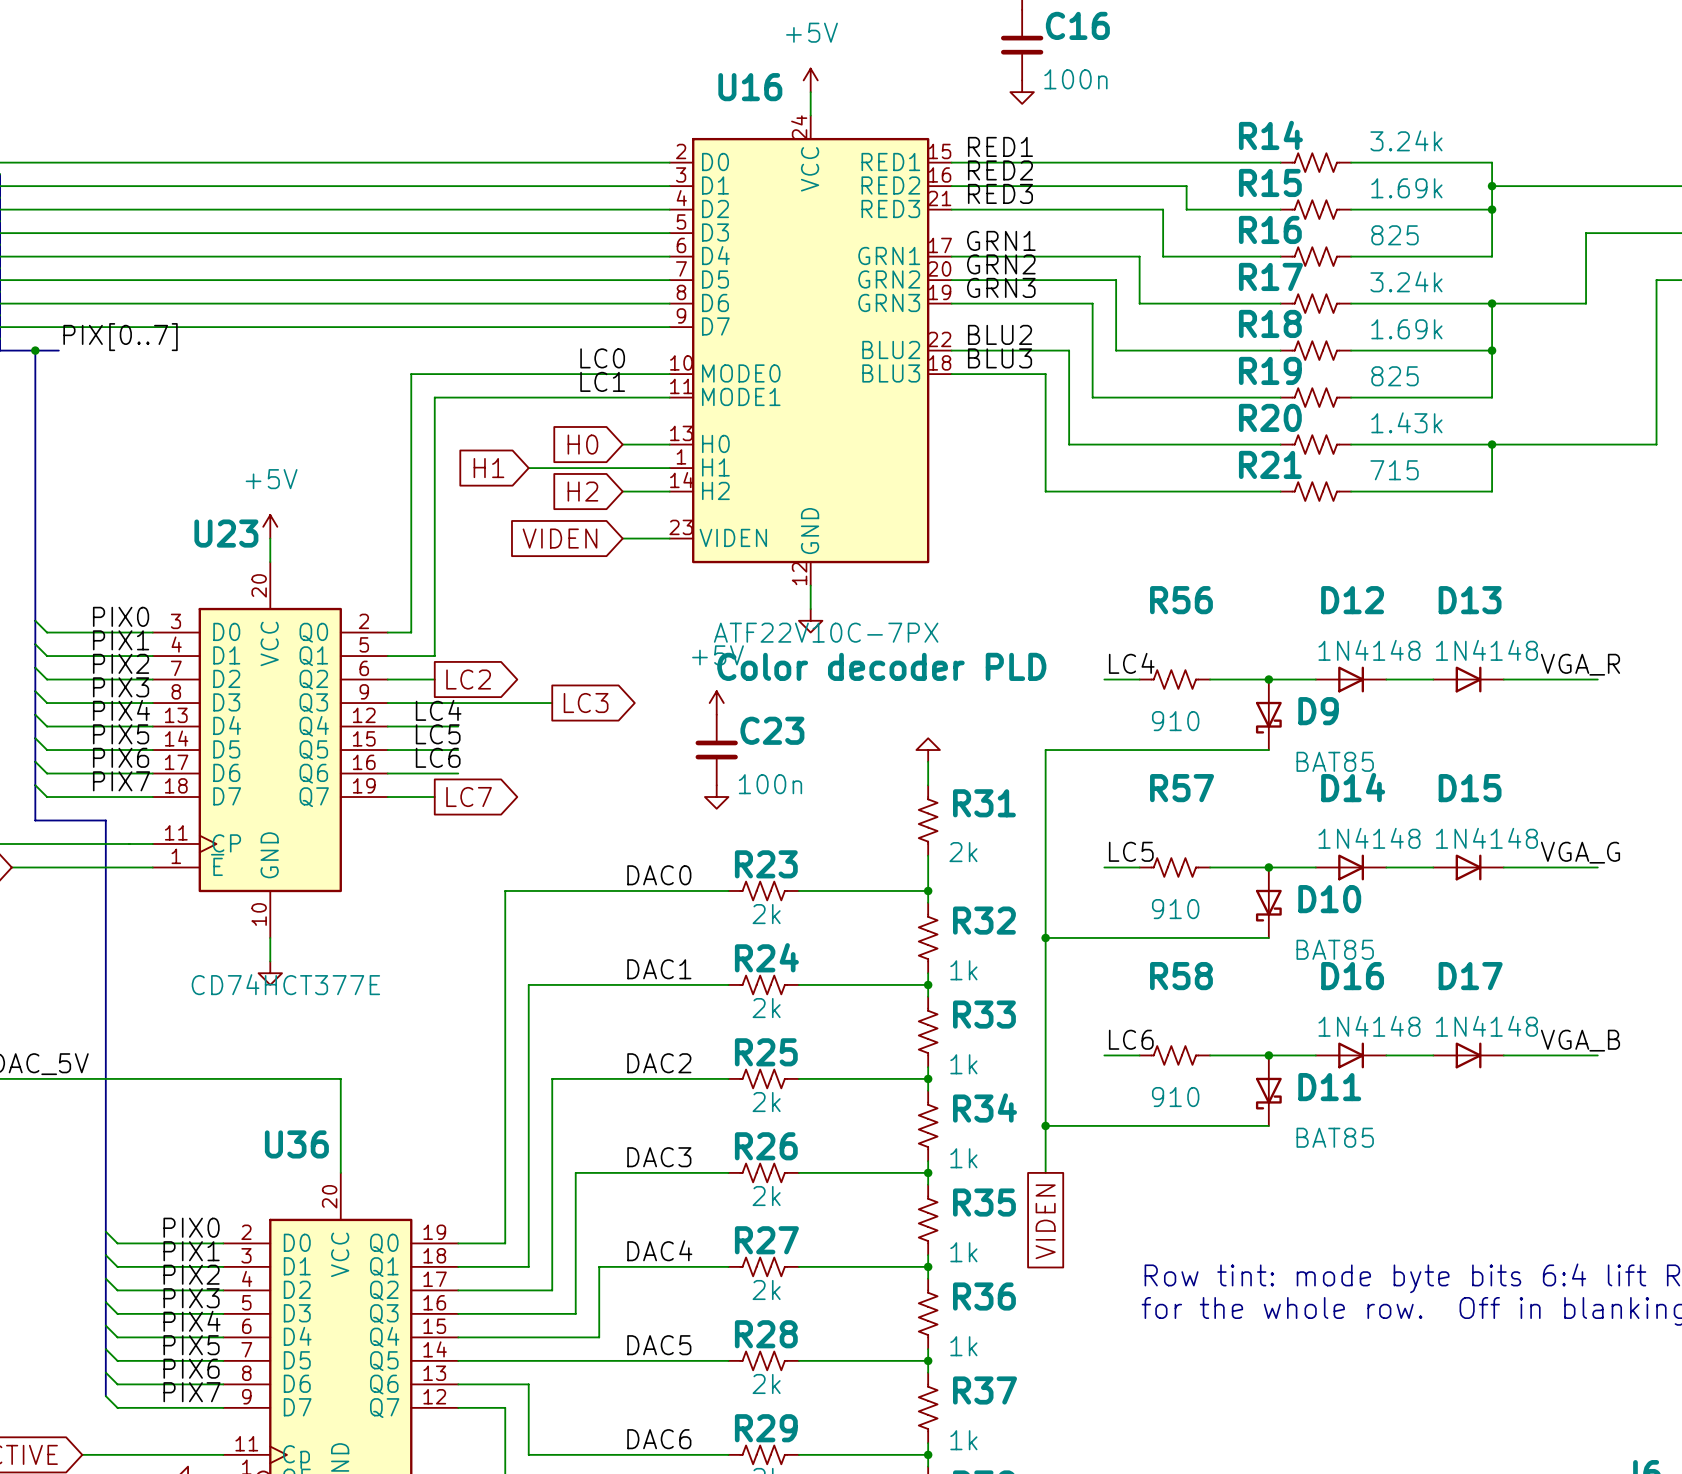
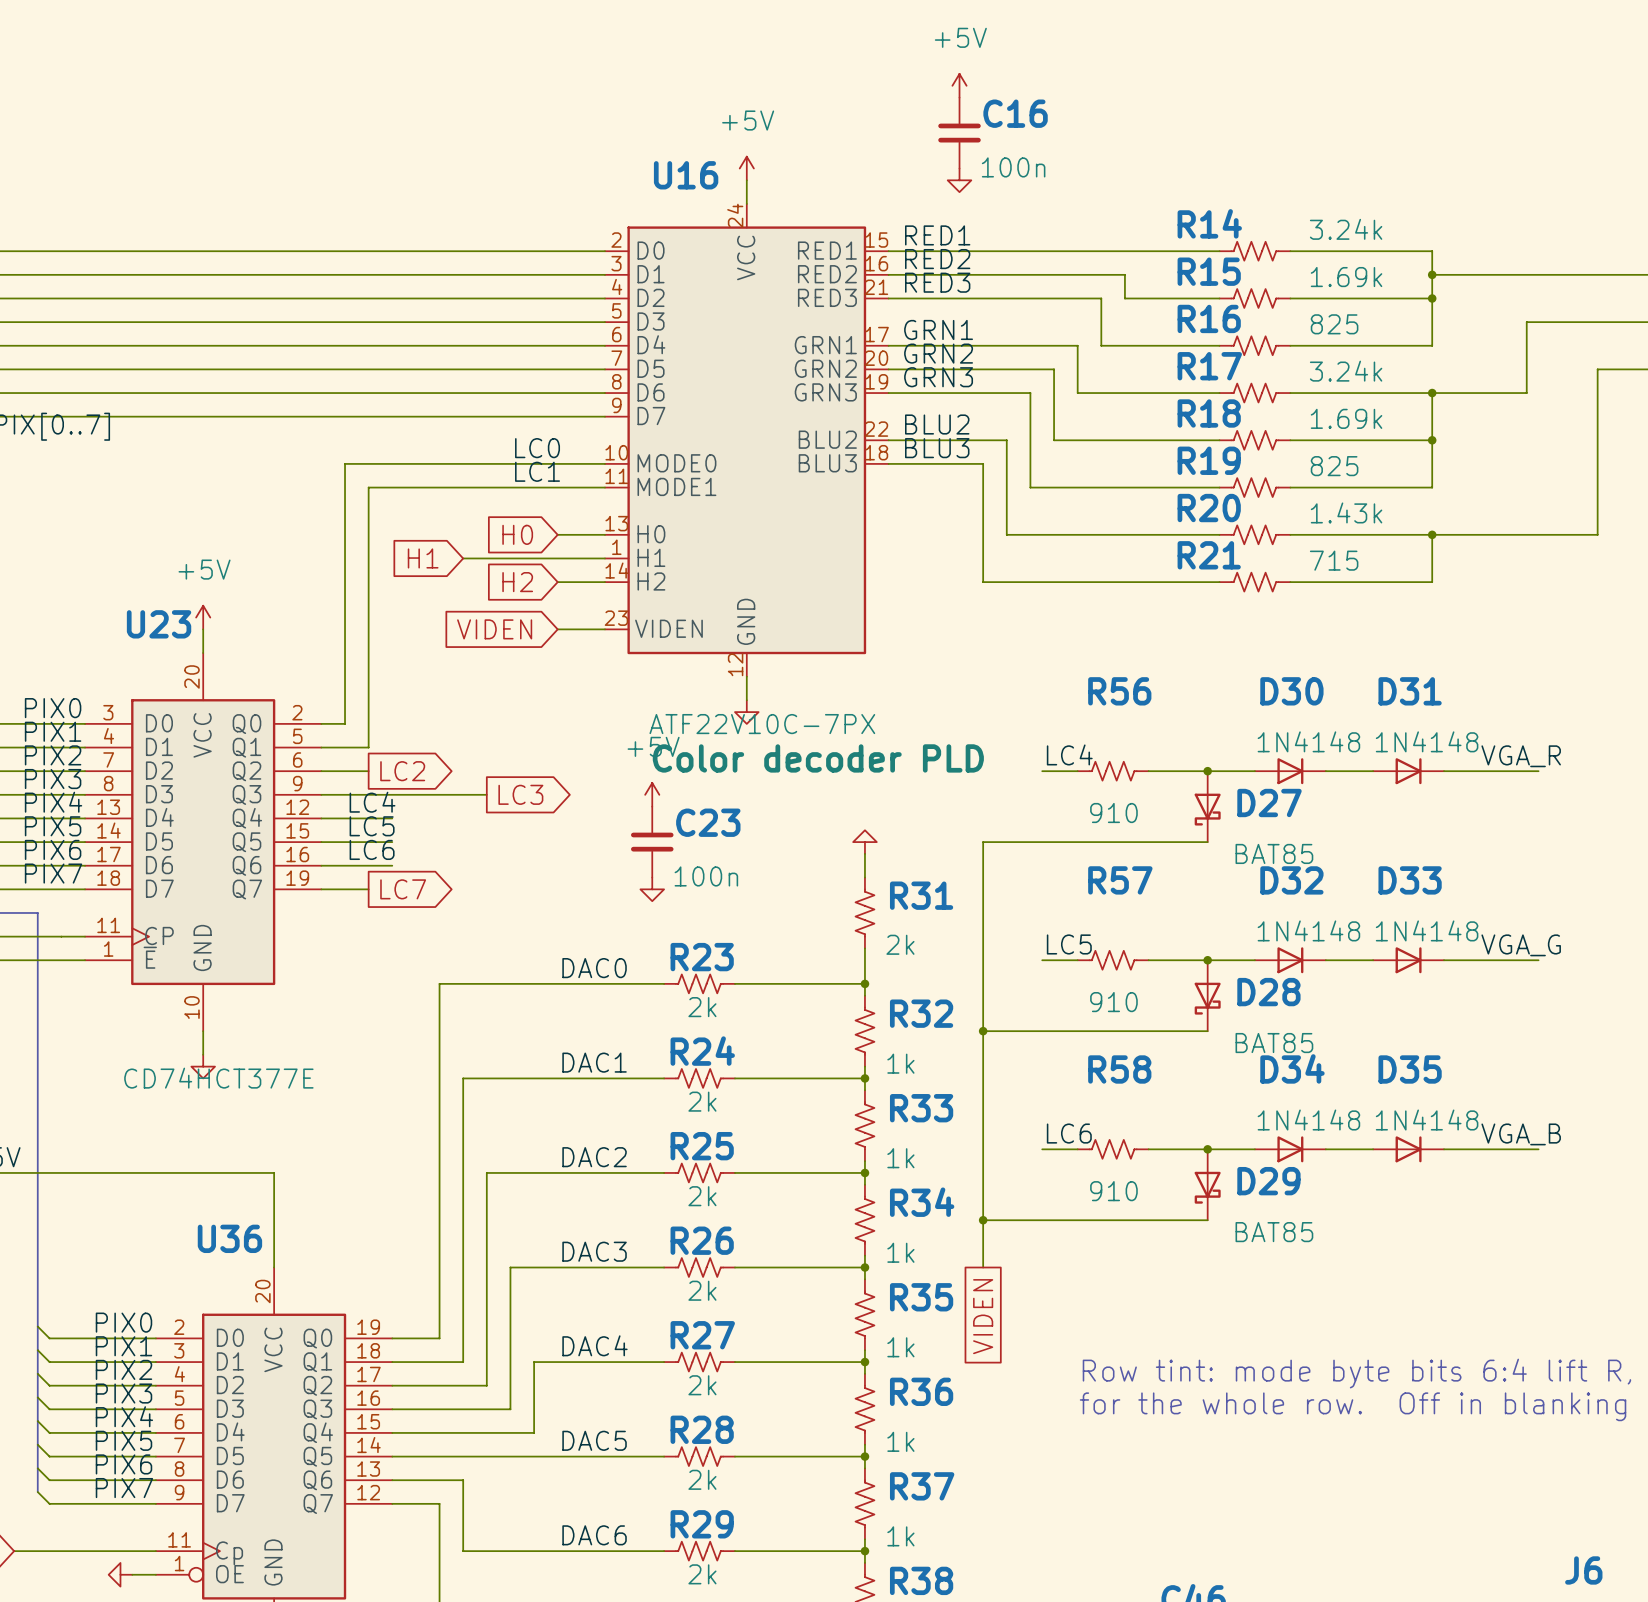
D12 name: D12 (1352, 600) -> D30 (1291, 691)
D13 name: D13 (1470, 600) -> D31 (1410, 691)
D9 name: D9 (1318, 711) -> D27 (1269, 803)
D14 name: D14 (1353, 787) -> D32 (1291, 880)
D15 name: D15 (1470, 788) -> D33 (1410, 880)
D10 name: D10 (1329, 899) -> D28 (1268, 992)
D16 name: D16 (1352, 976) -> D34 (1292, 1068)
D17 name: D17 (1470, 976) -> D35 (1410, 1069)
D11 name: D11 (1329, 1087) -> D29 (1268, 1181)

